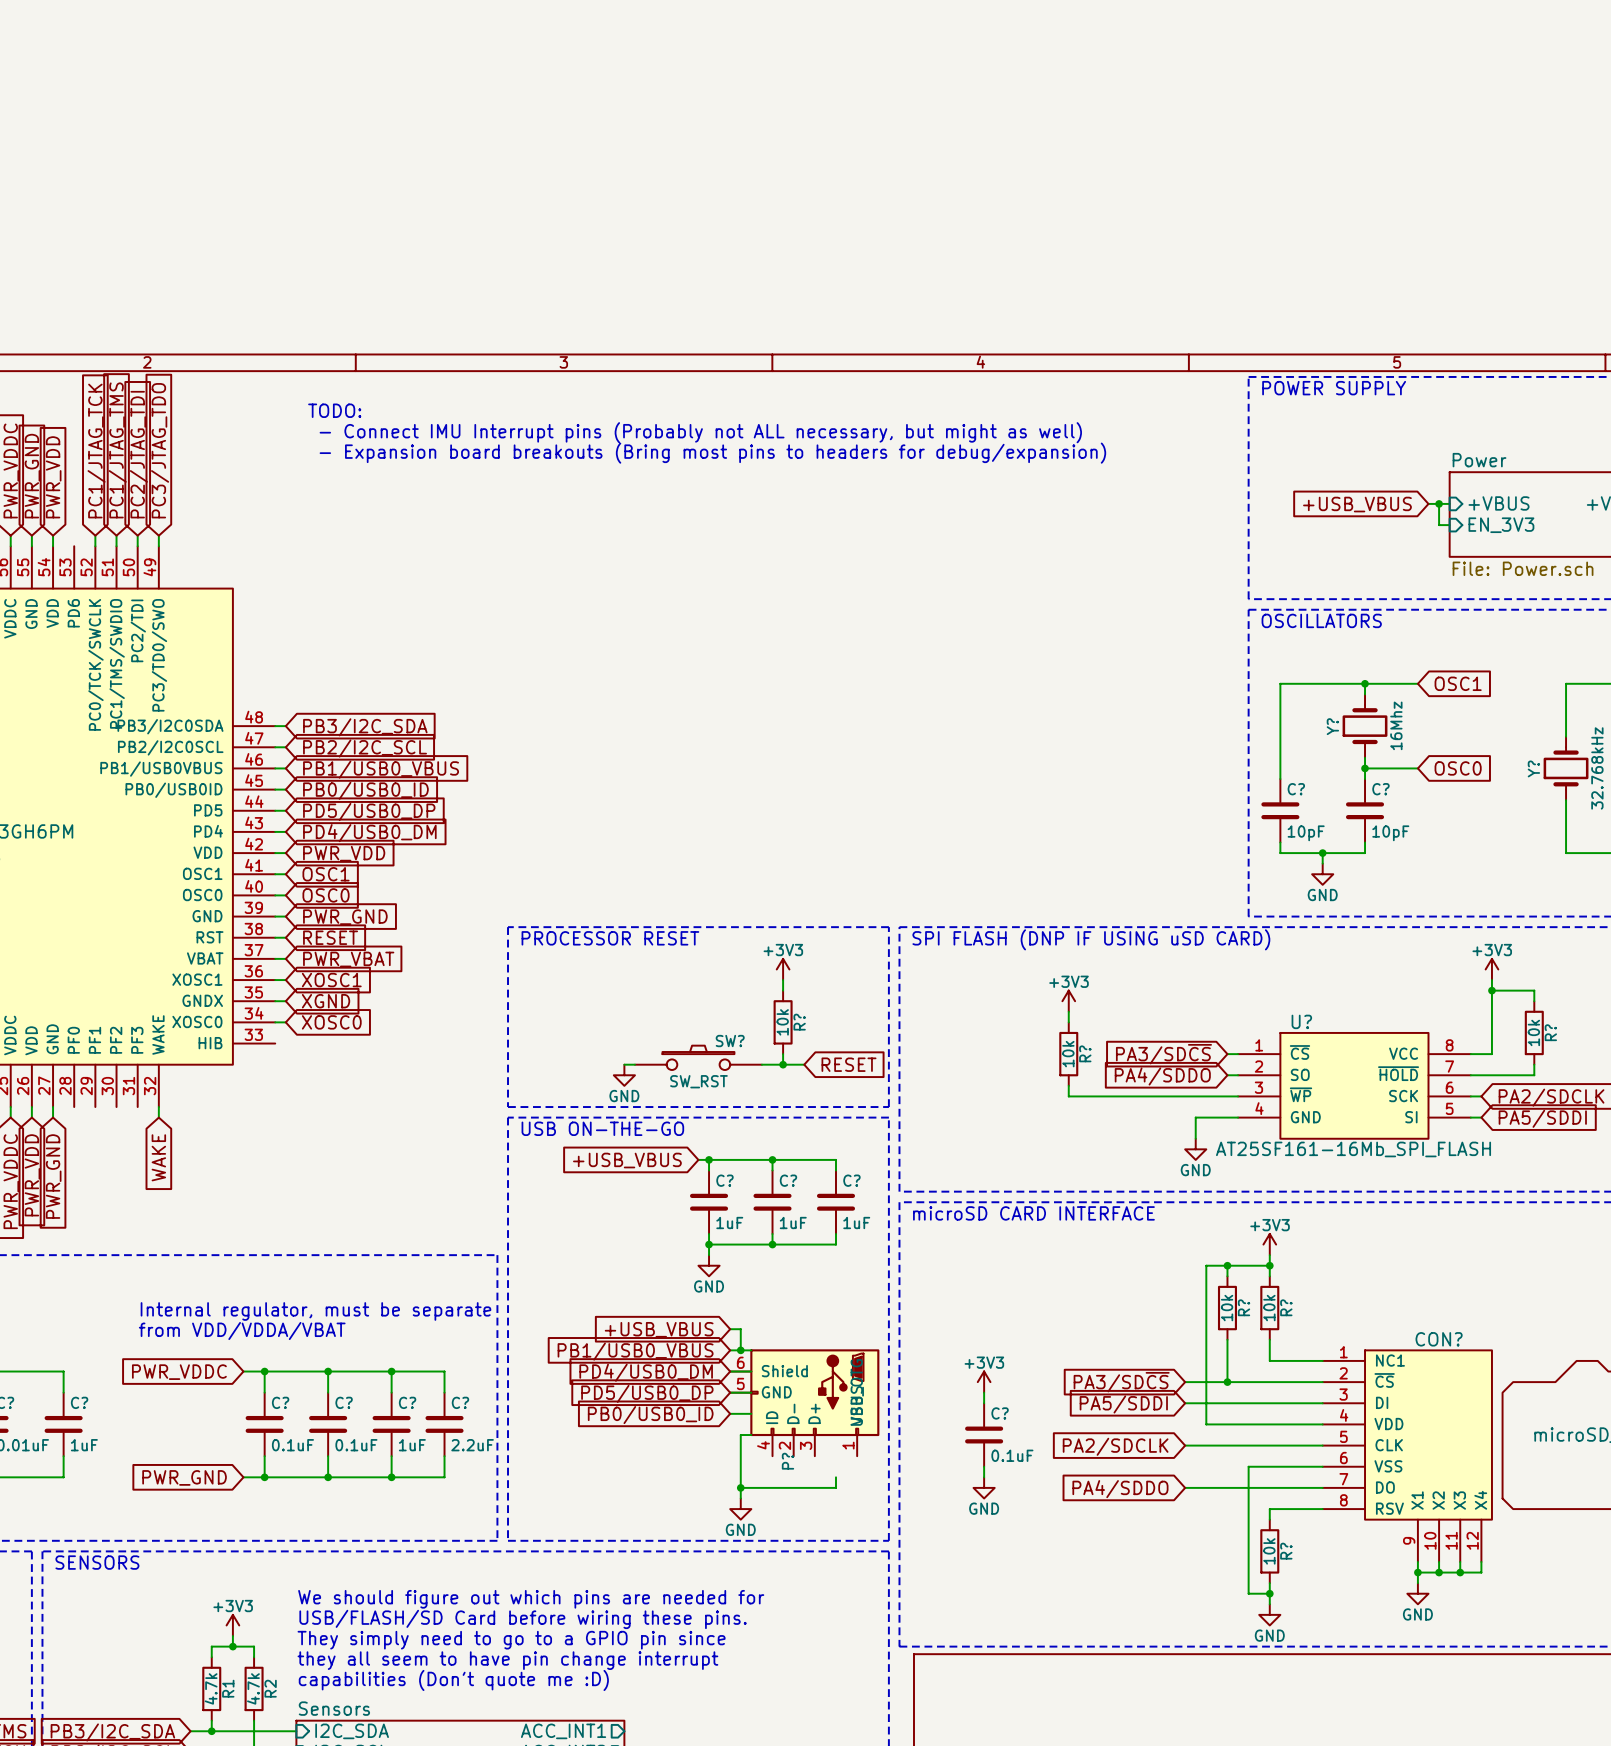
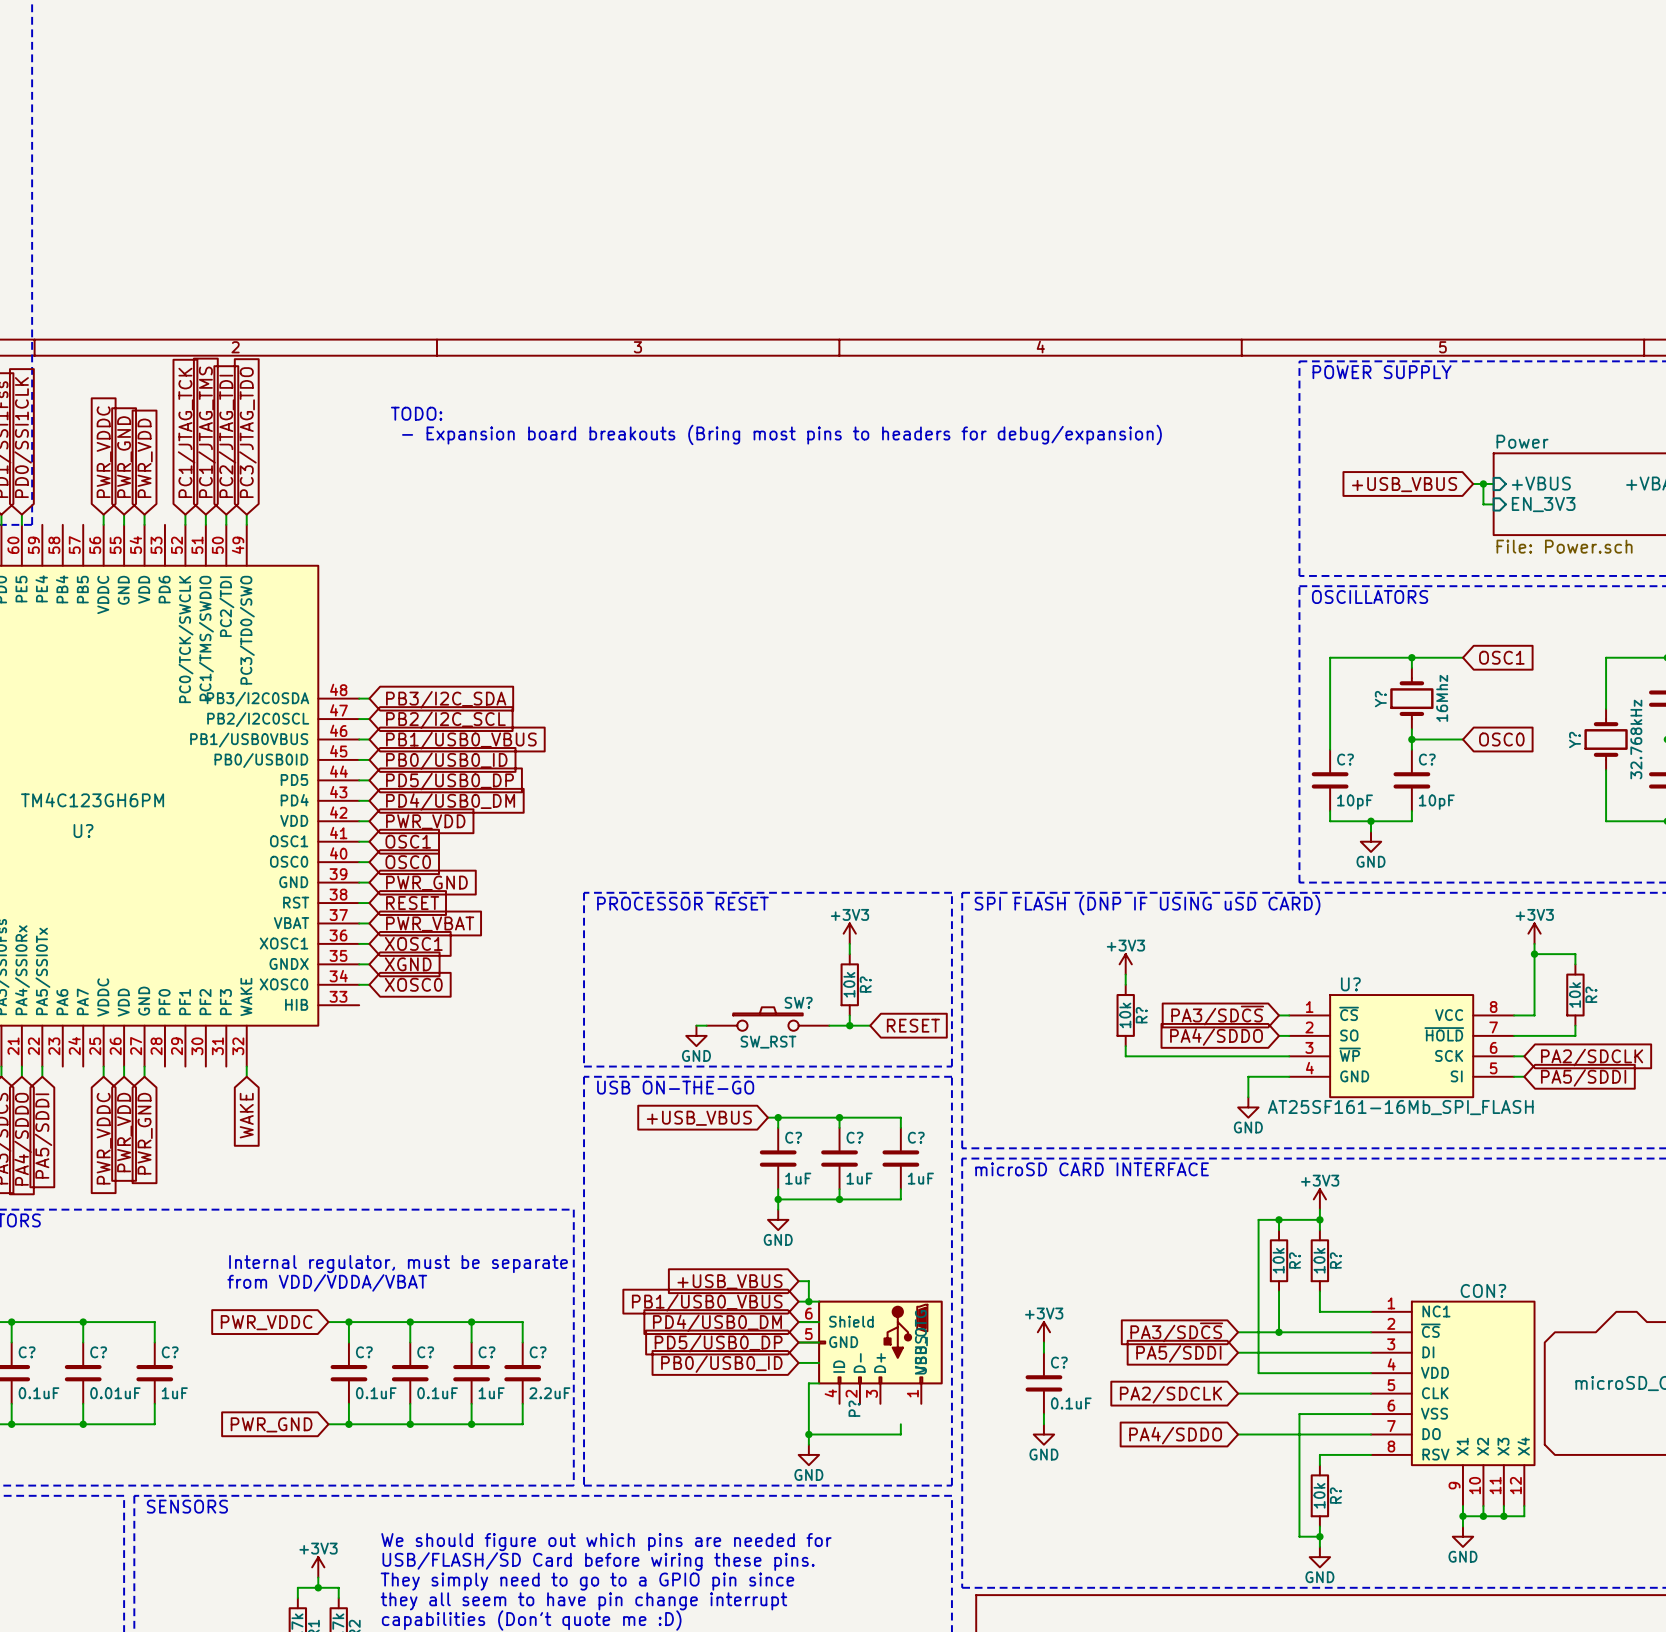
text: TODO: (334, 410) -> none
text: - Connect IMU Interrupt pins (Probably not ALL necessary, but might as well) (700, 432) -> TODO: (416, 413)

